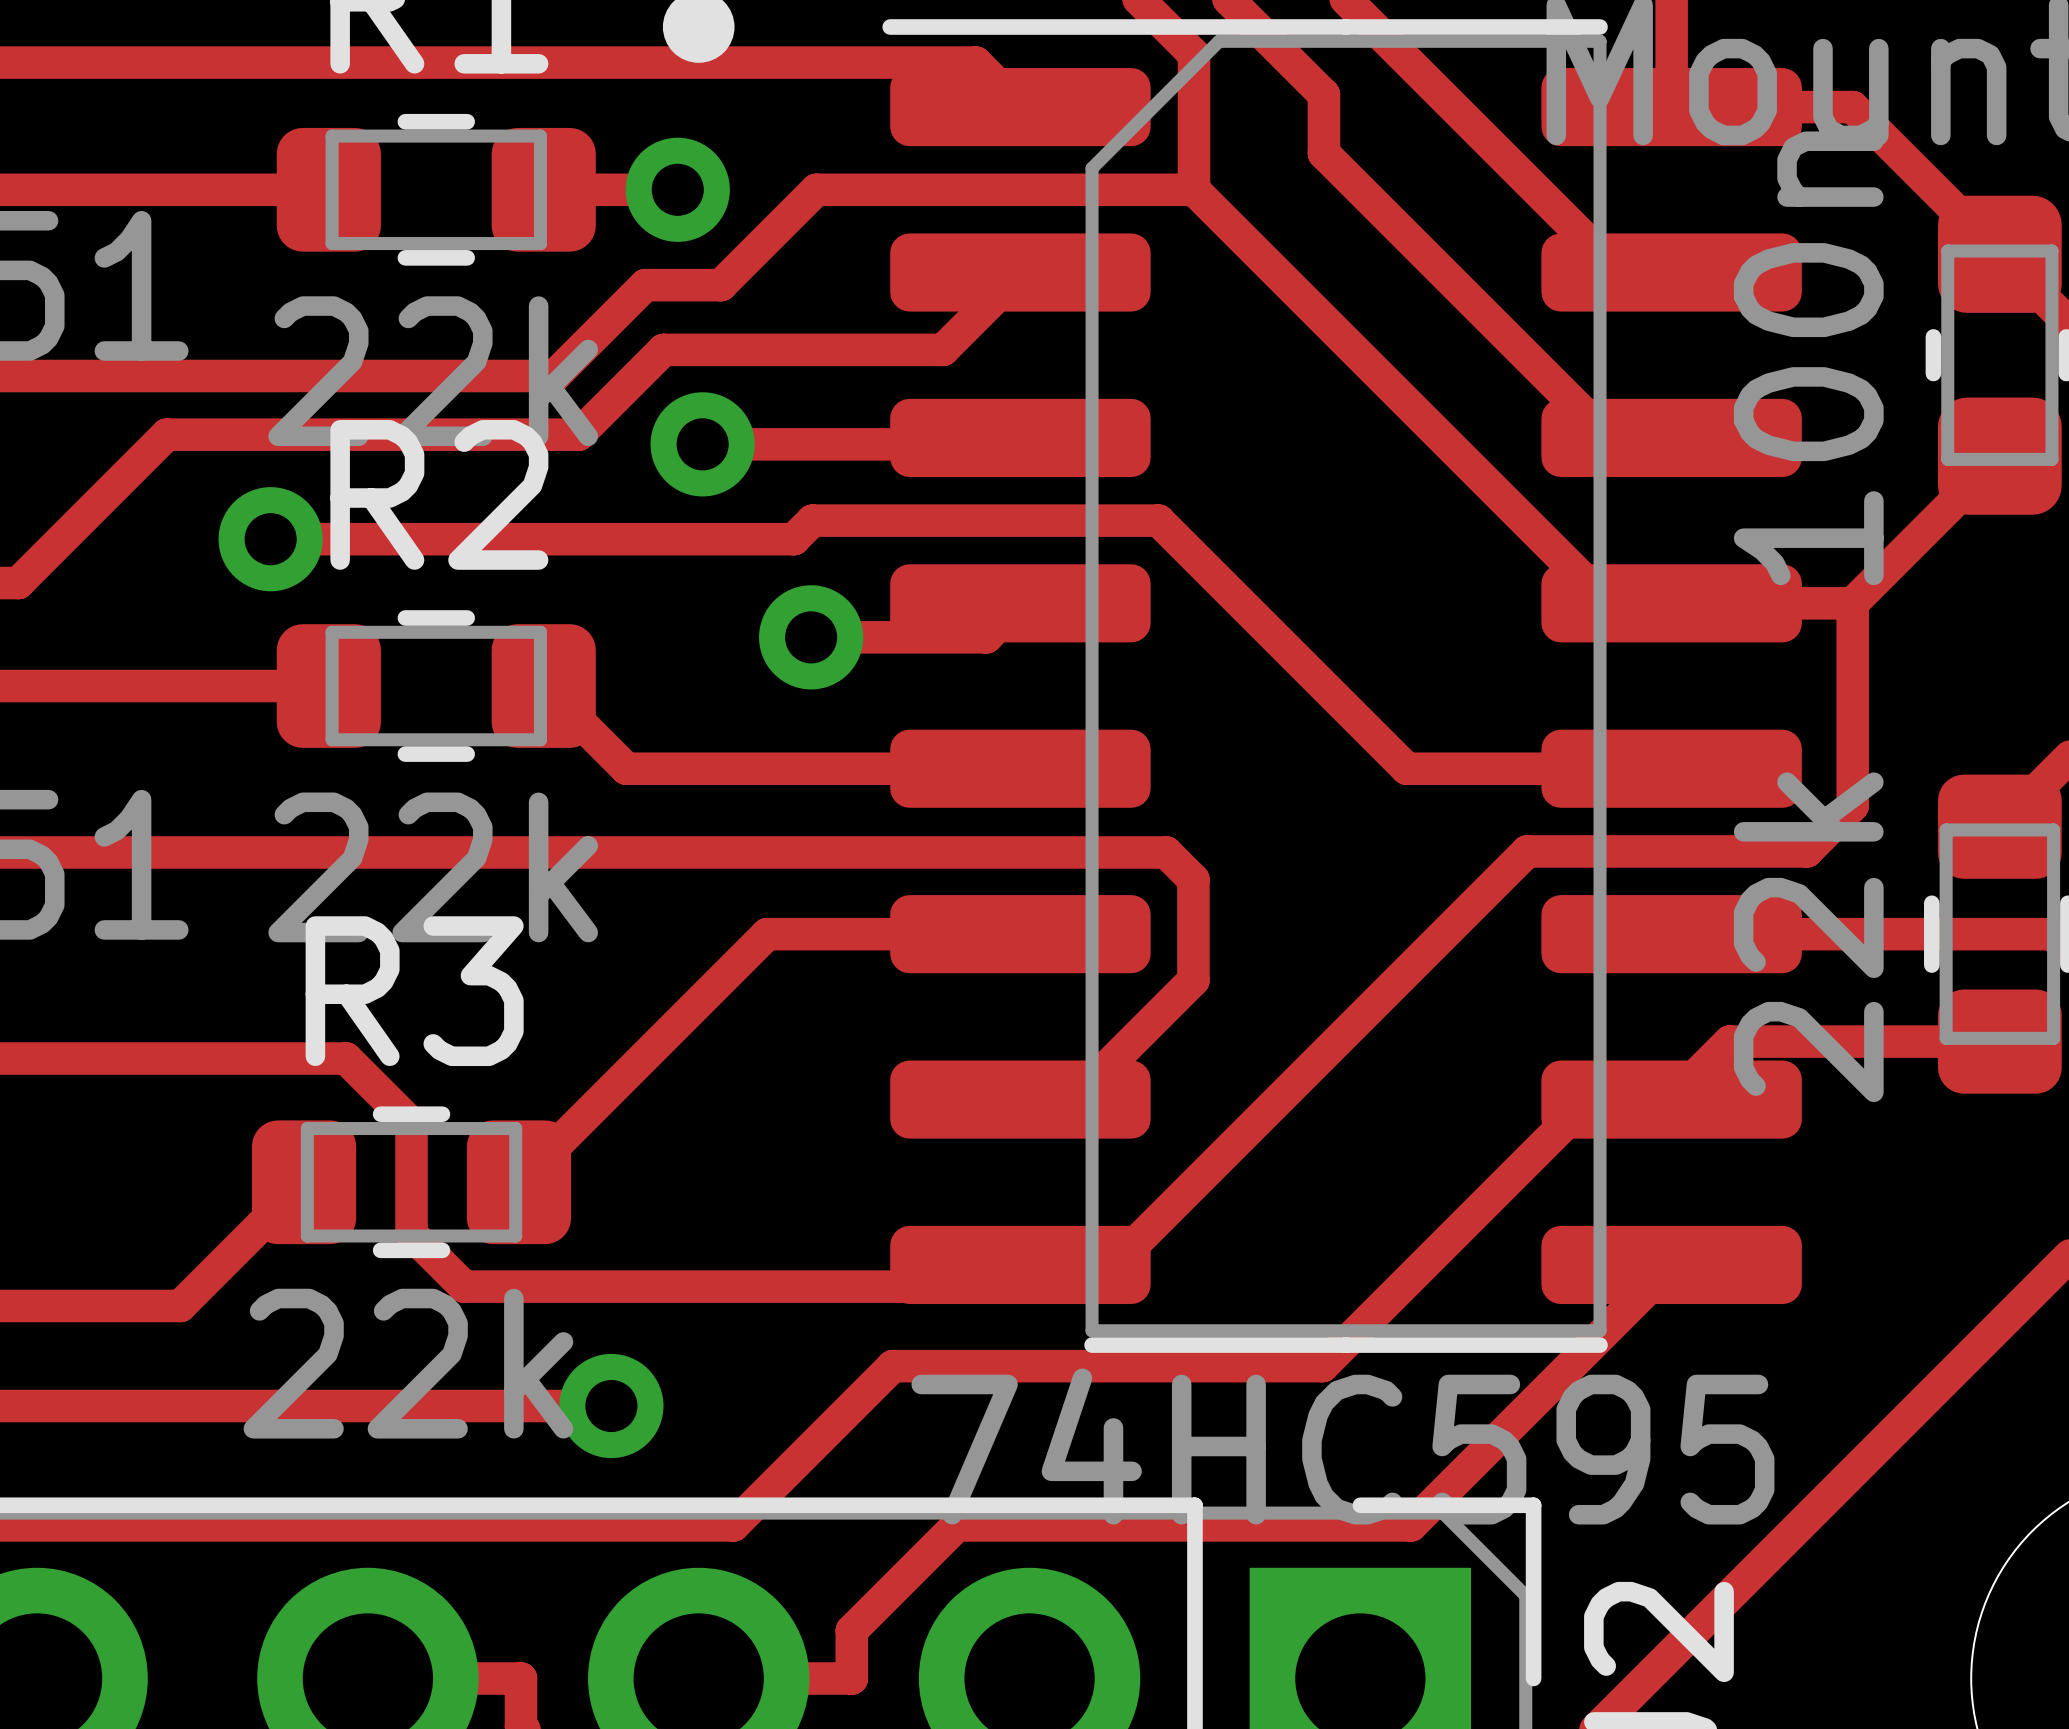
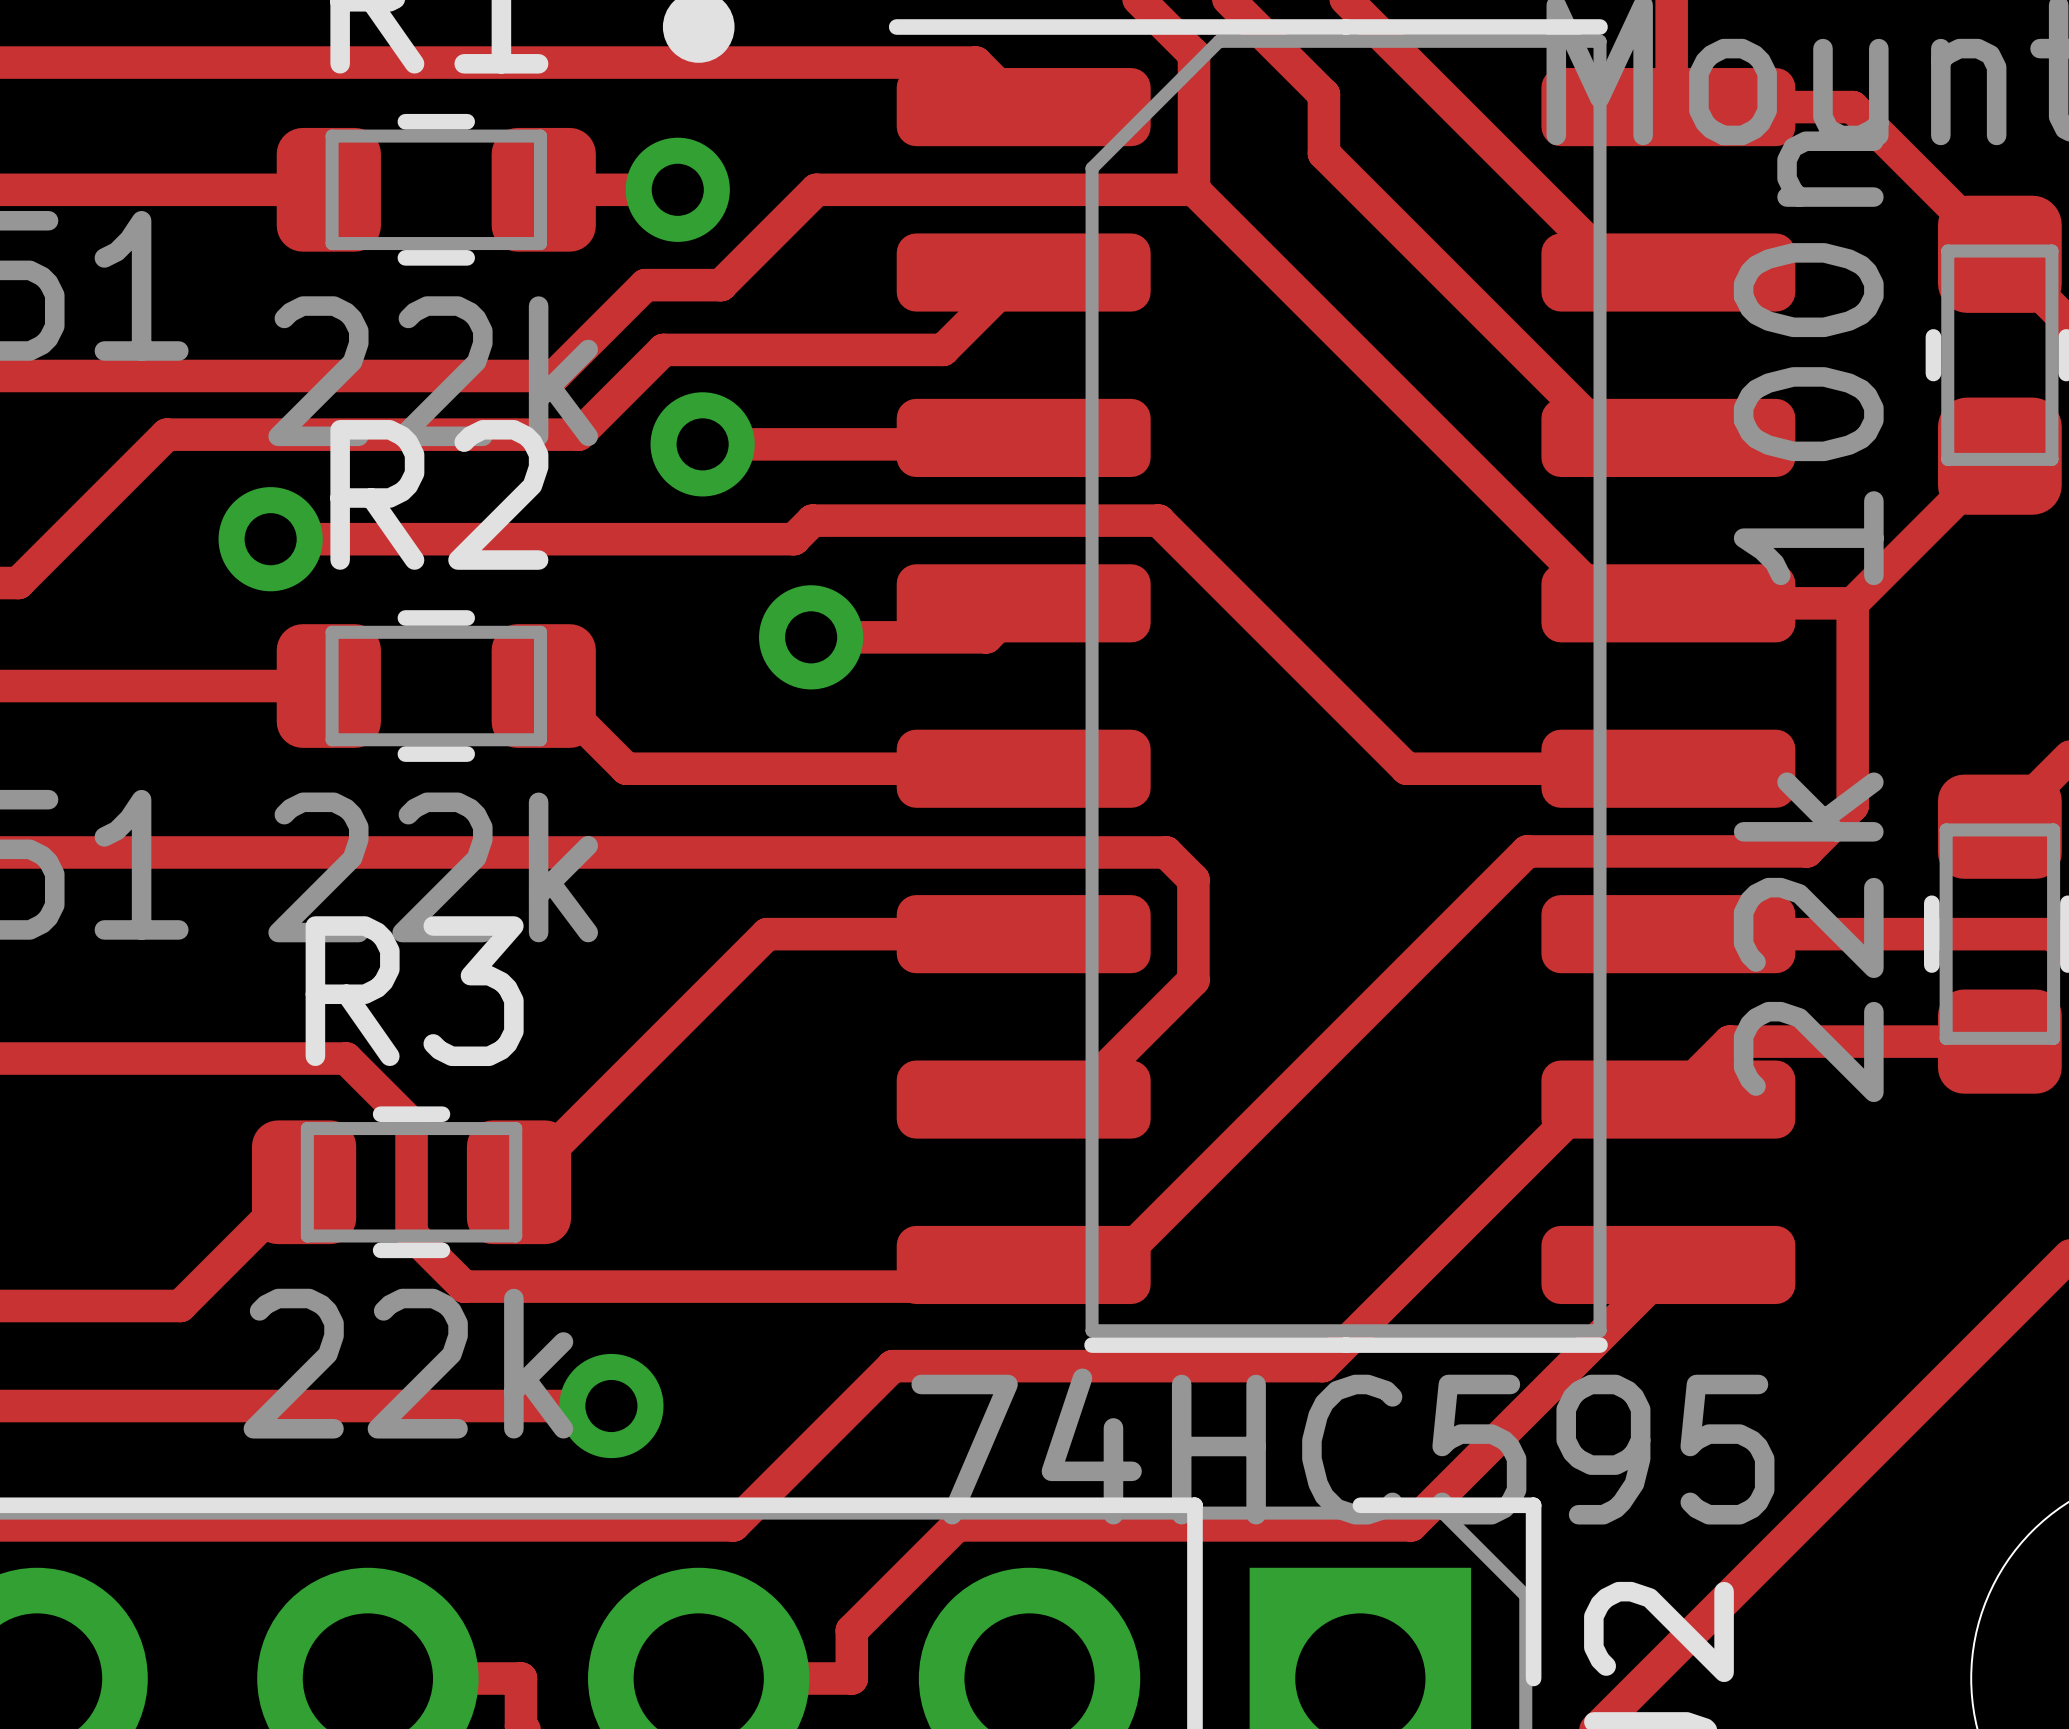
part footprint: [882, 19, 1802, 1353] -> [888, 19, 1796, 1353]

